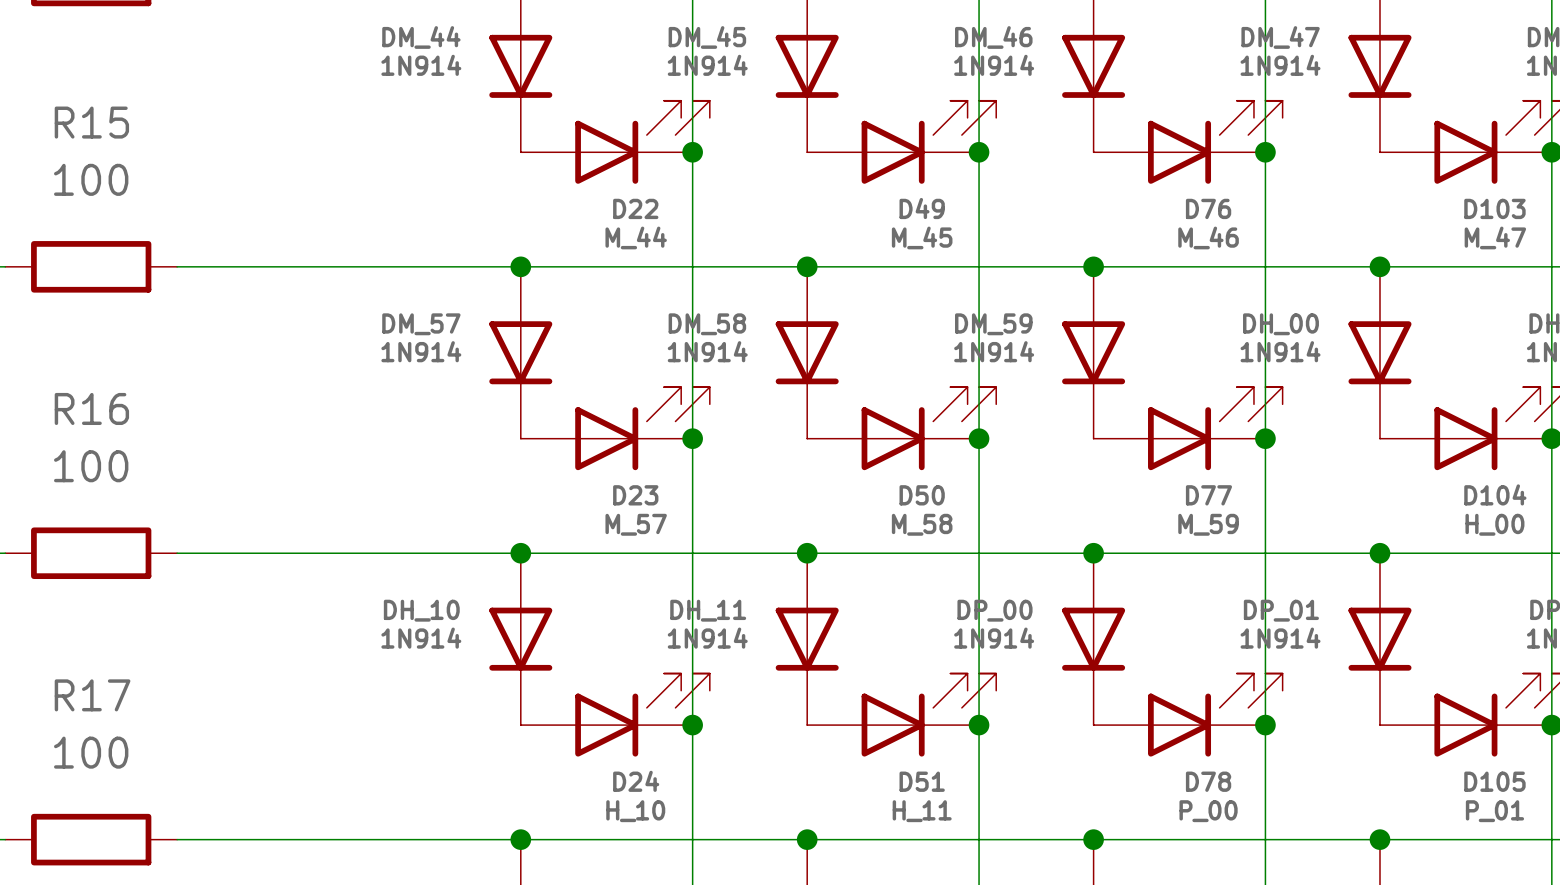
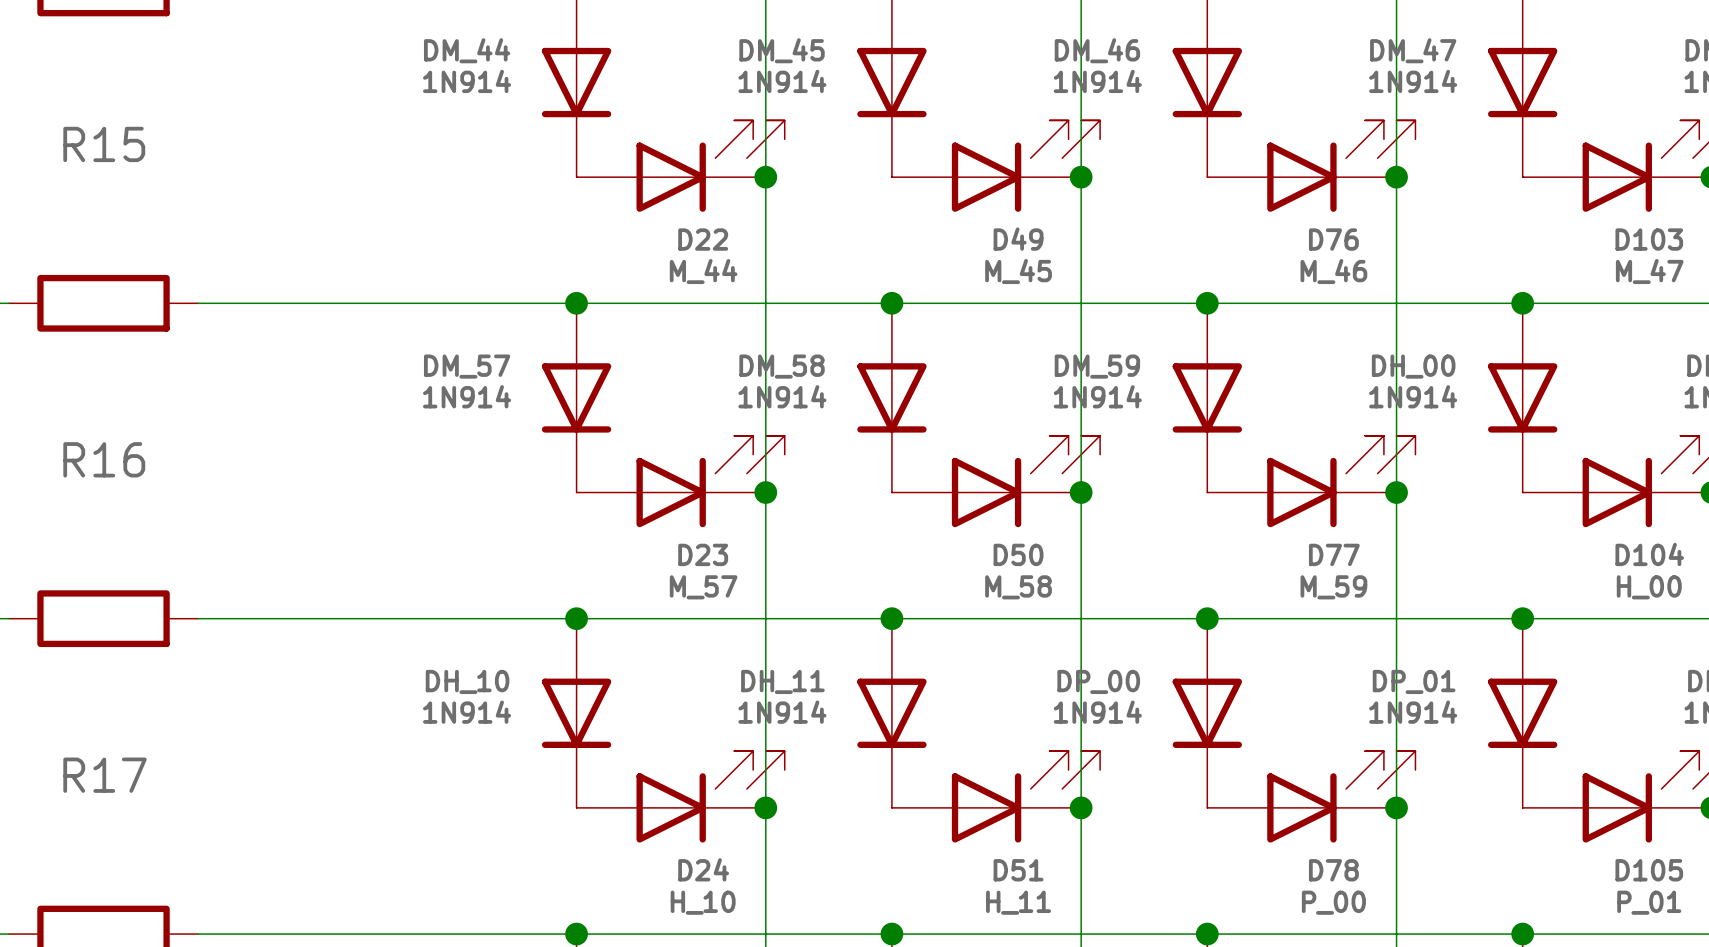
R15 value: 100 (91, 179) -> none
R16 value: 100 (91, 466) -> none
R17 value: 100 (91, 752) -> none

